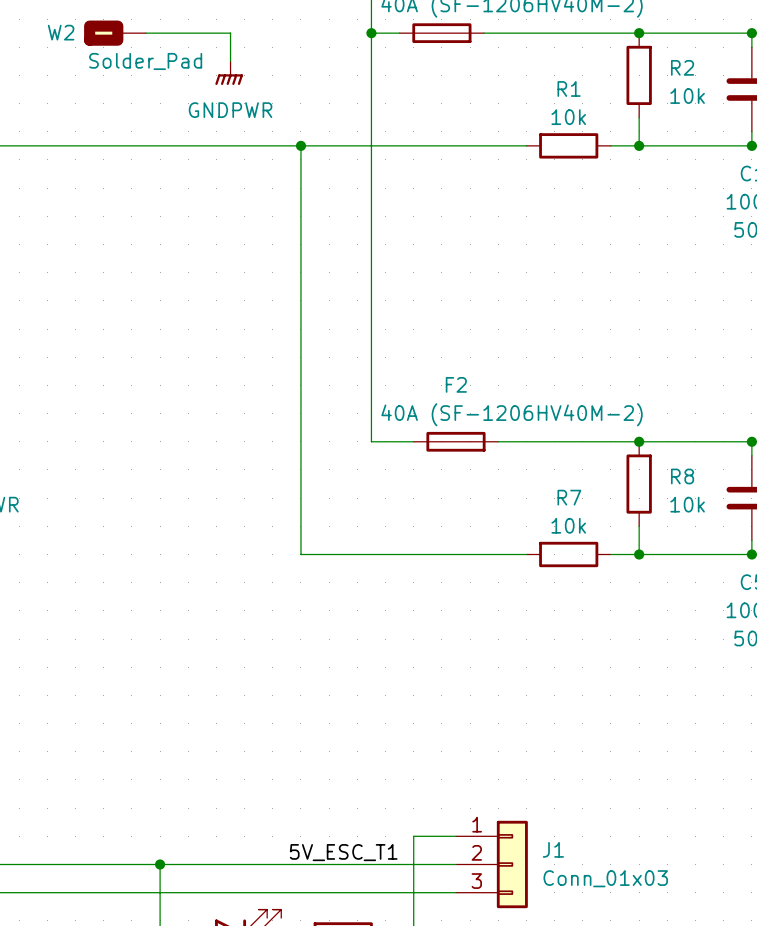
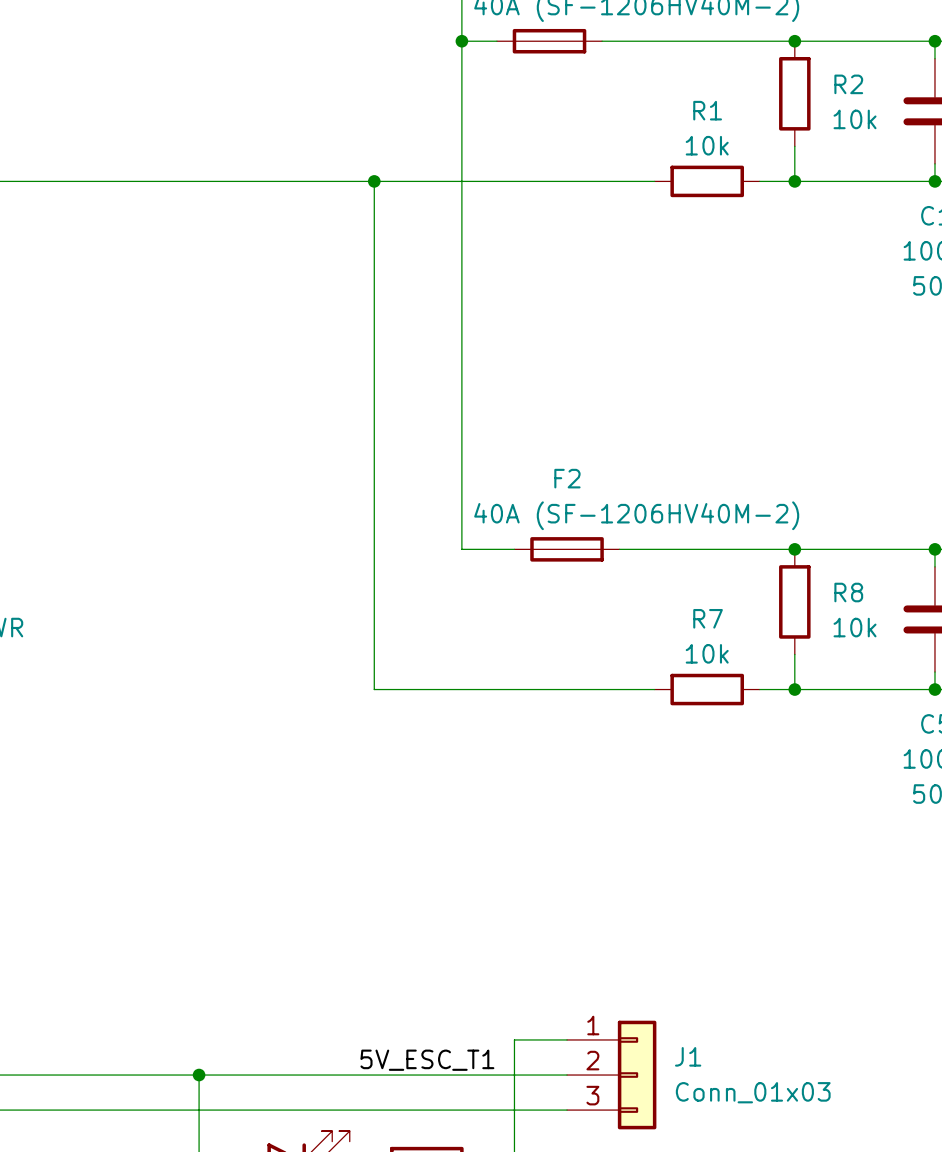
W2: Solder_Pad (115, 33) -> none
wire: (145, 33) (230, 33) (230, 61) -> none
power symbol: GNDPWR (229, 73) -> none

